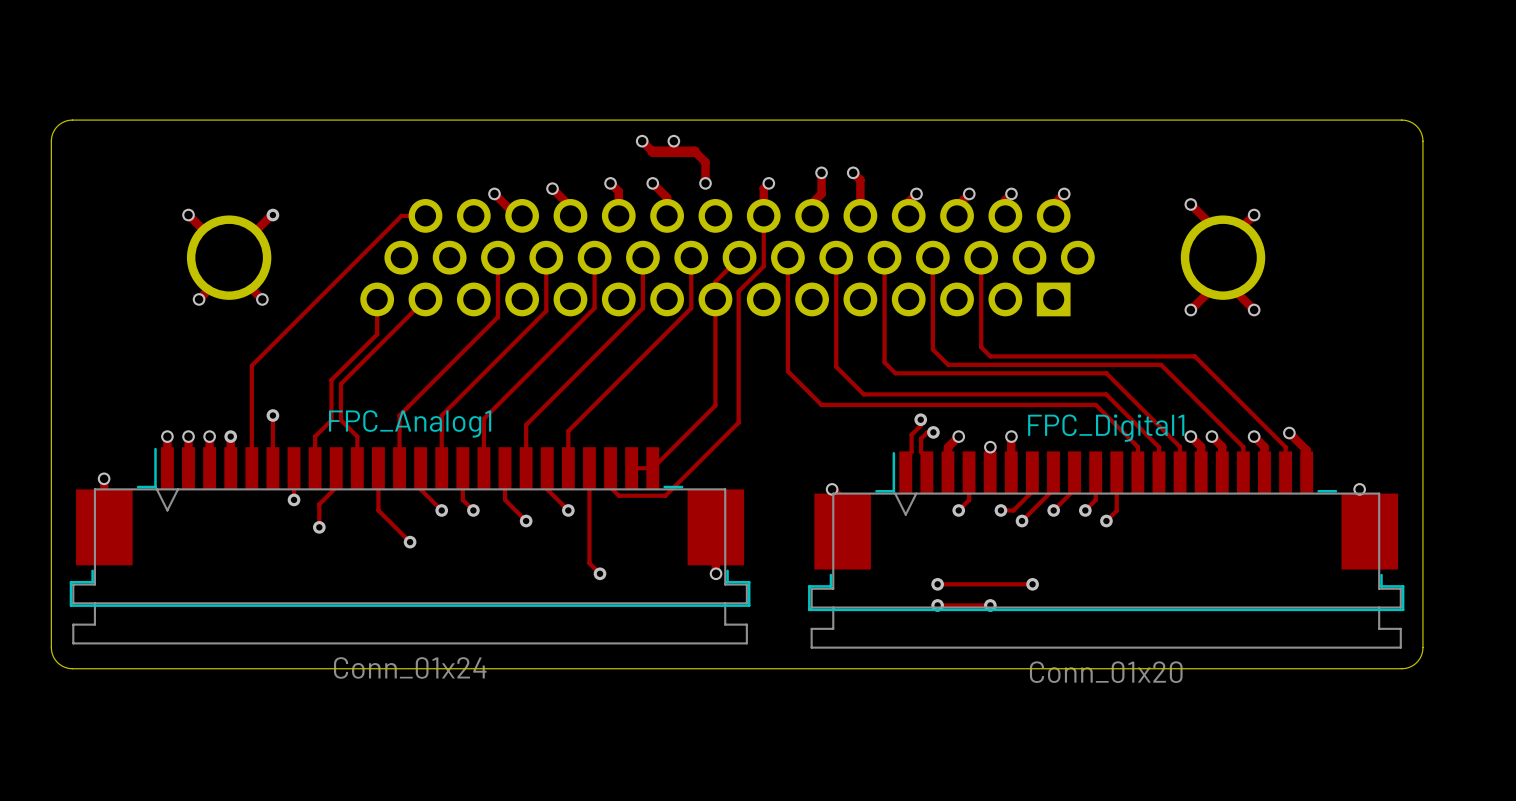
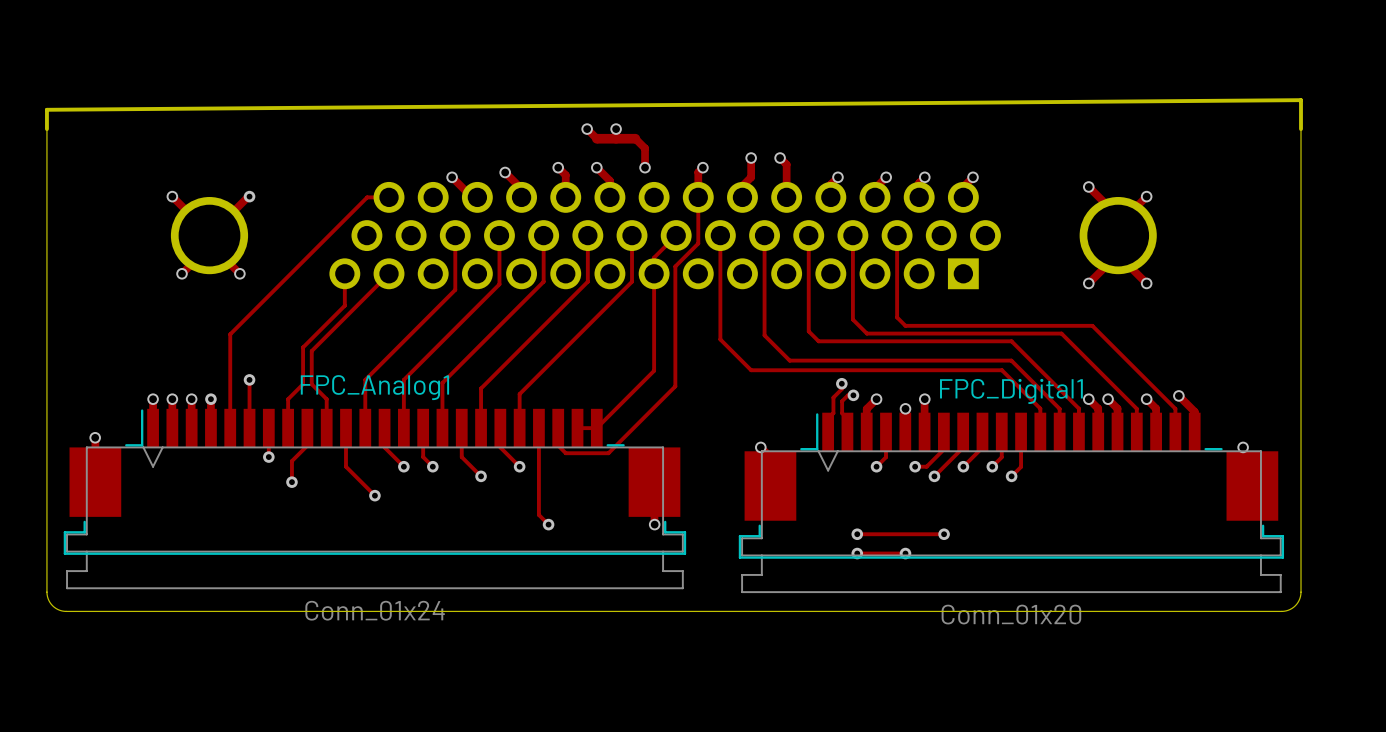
board edge: (51, 141) (52, 134) (57, 126) (63, 122) (72, 120) (1401, 120) (1411, 122) (1416, 126) (1420, 132) (1422, 141) -> (46, 129) (46, 109) (1301, 100) (1301, 129)

